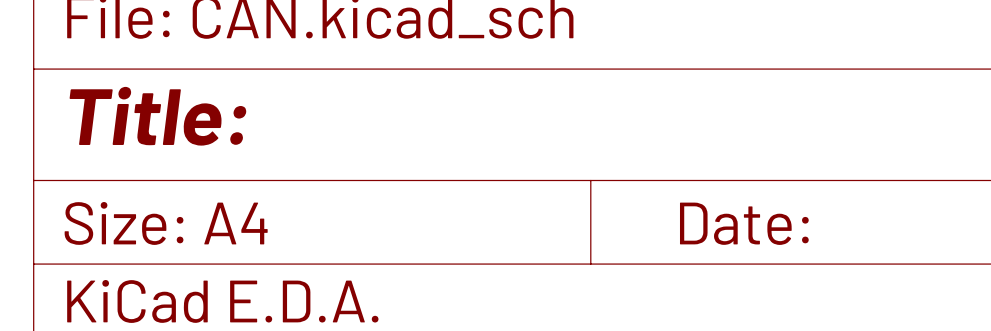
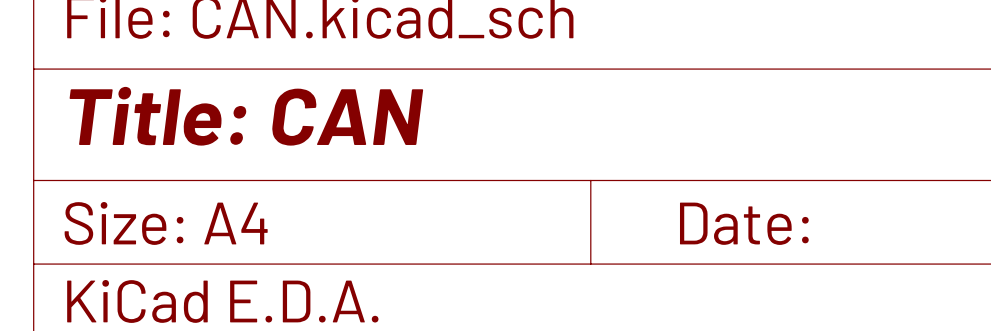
title block: Title: (158, 116) -> Title: CAN (246, 116)

